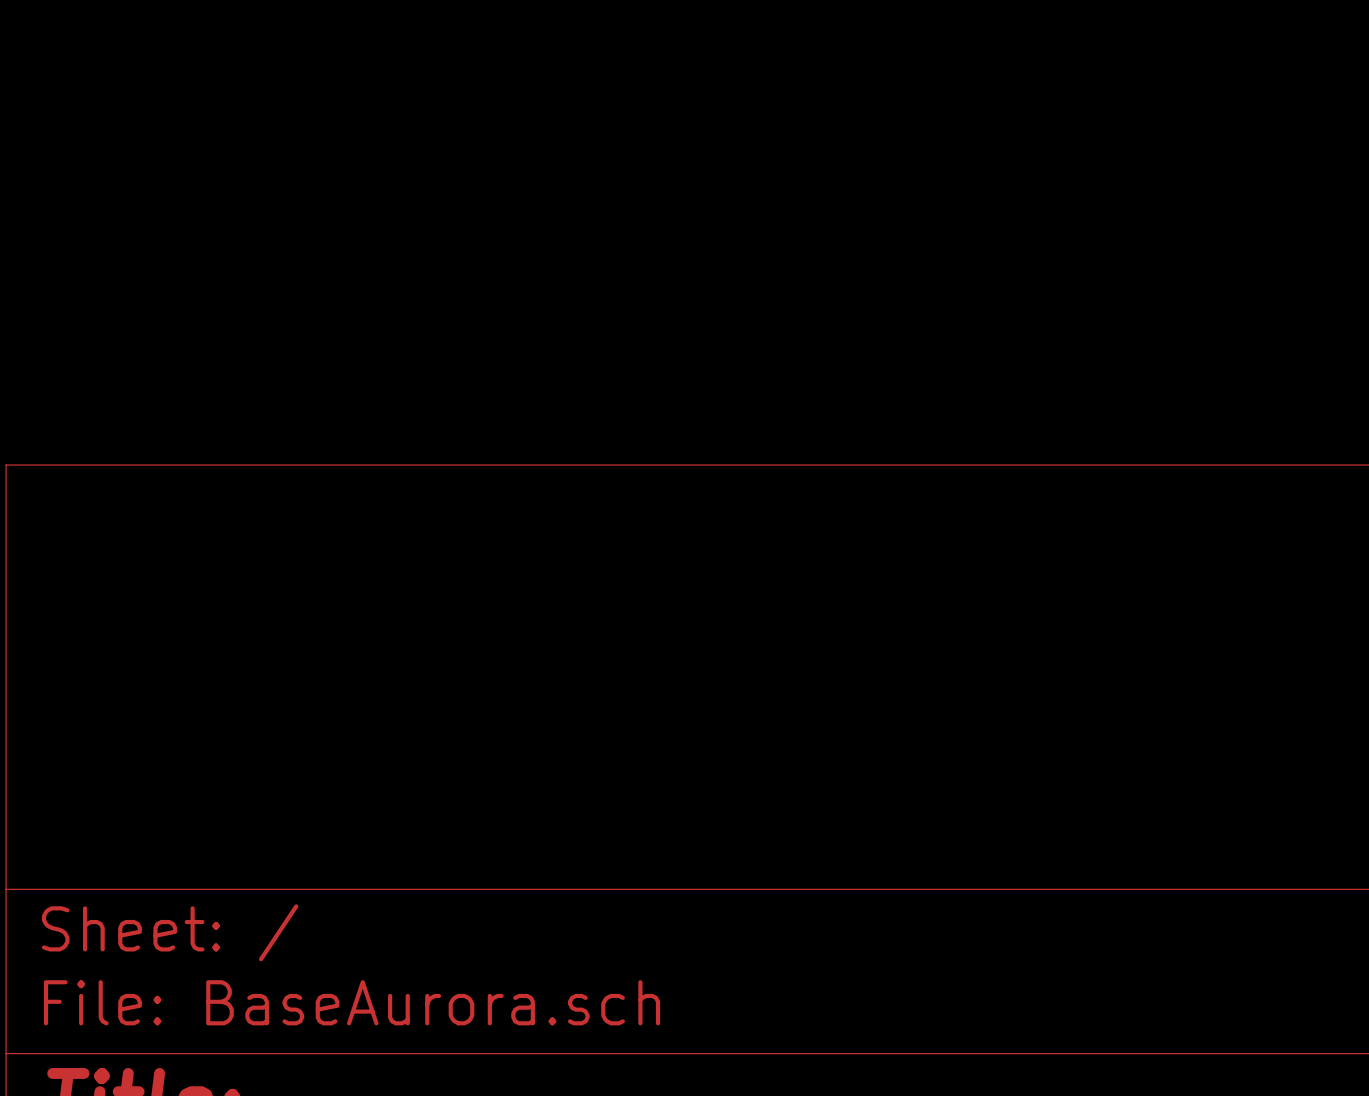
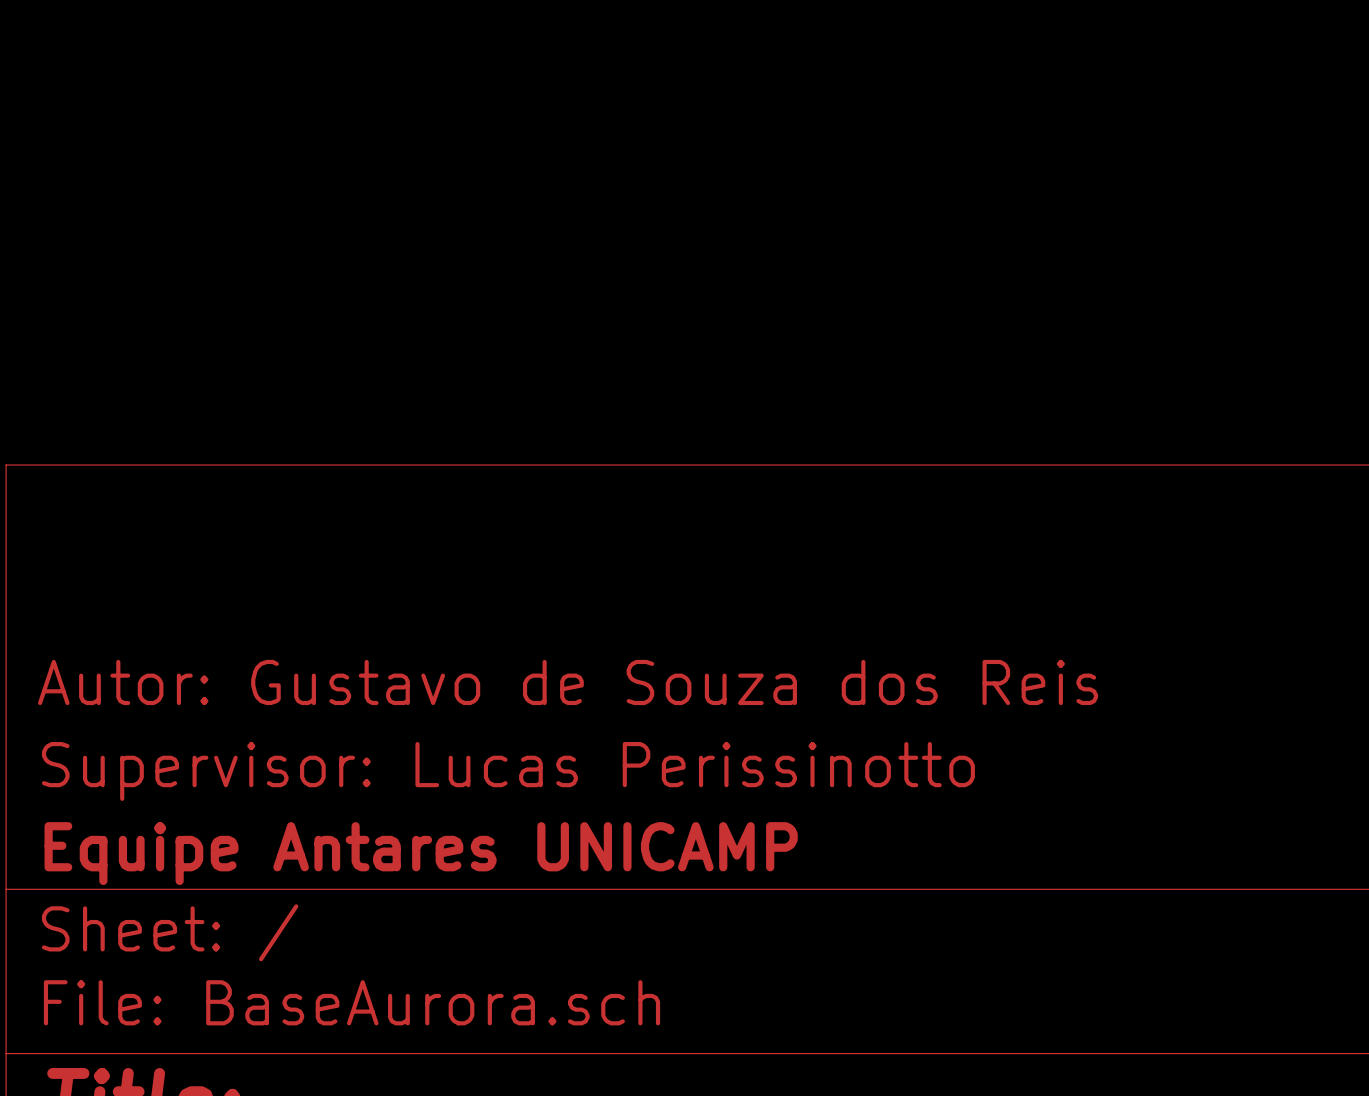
title block: none -> Autor: Gustavo de Souza dos Reis (568, 682)
title block: none -> Supervisor: Lucas Perissinotto (508, 771)
title block: none -> Equipe Antares UNICAMP (421, 853)

